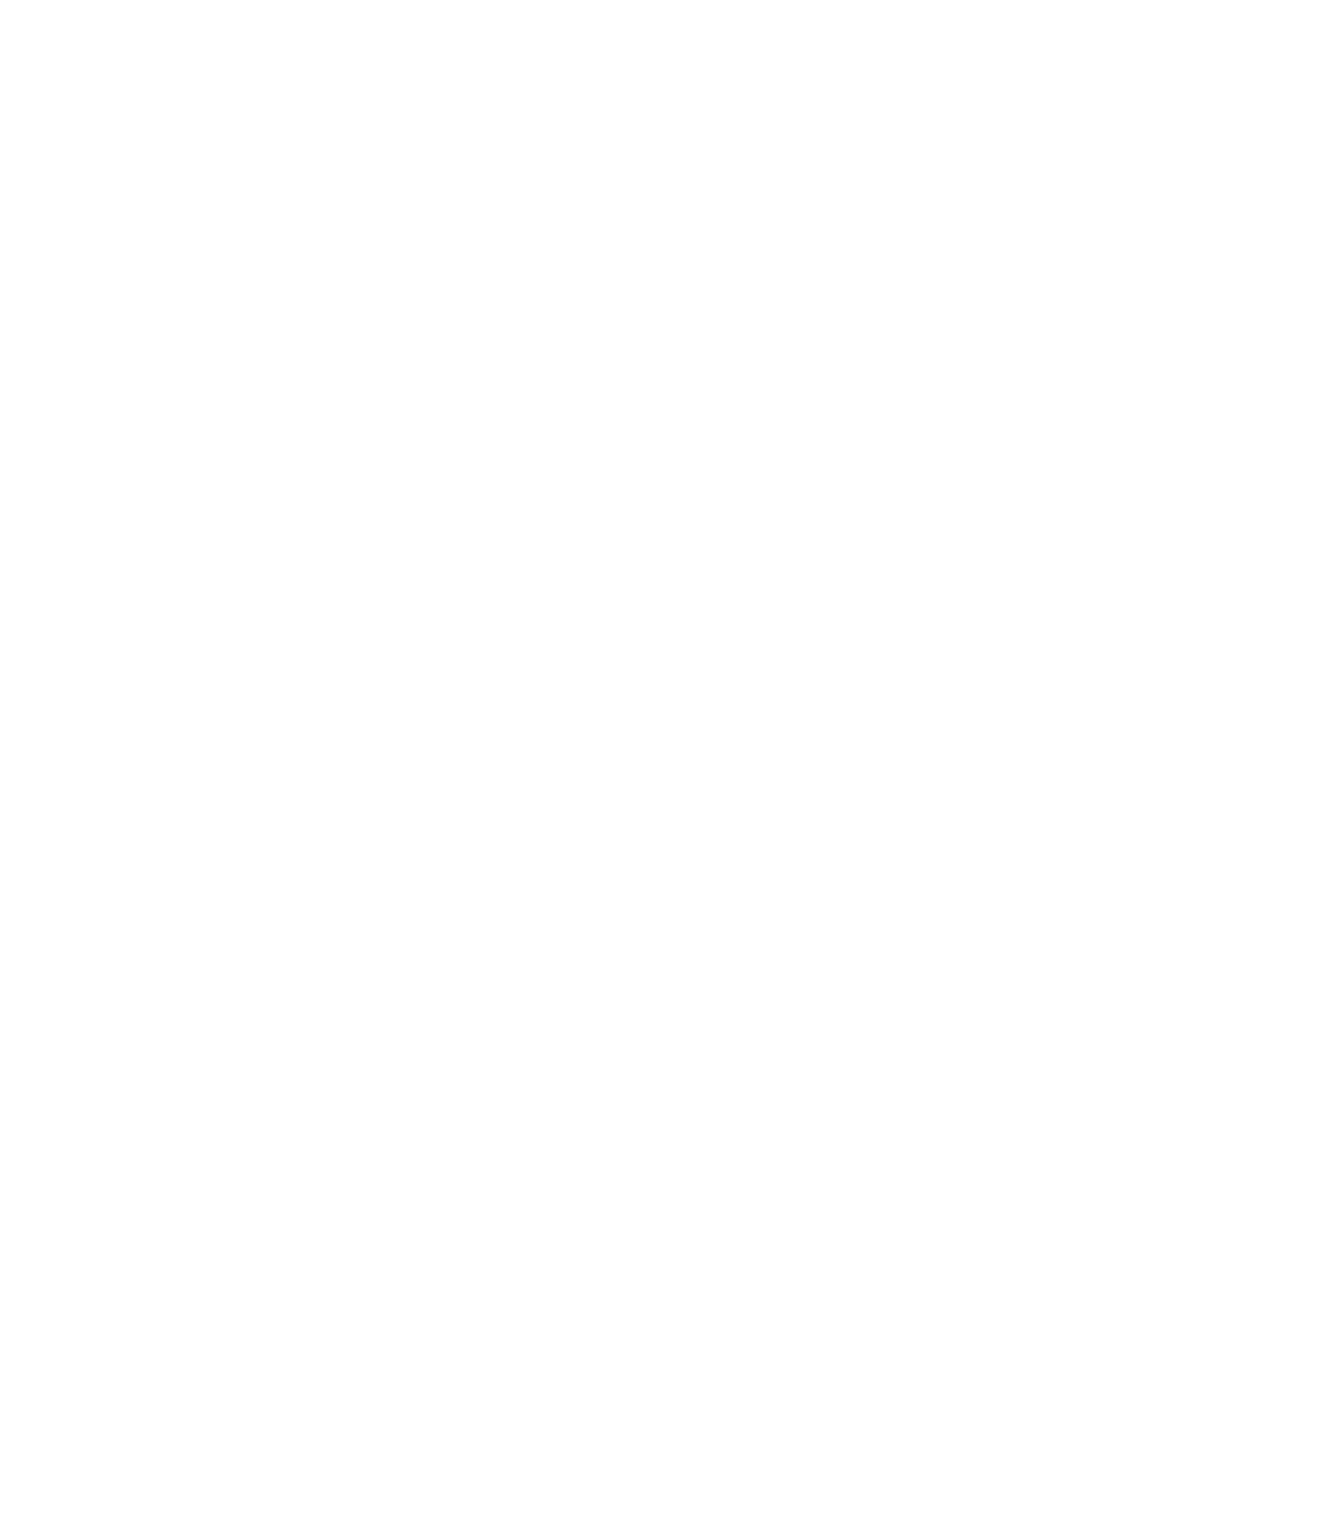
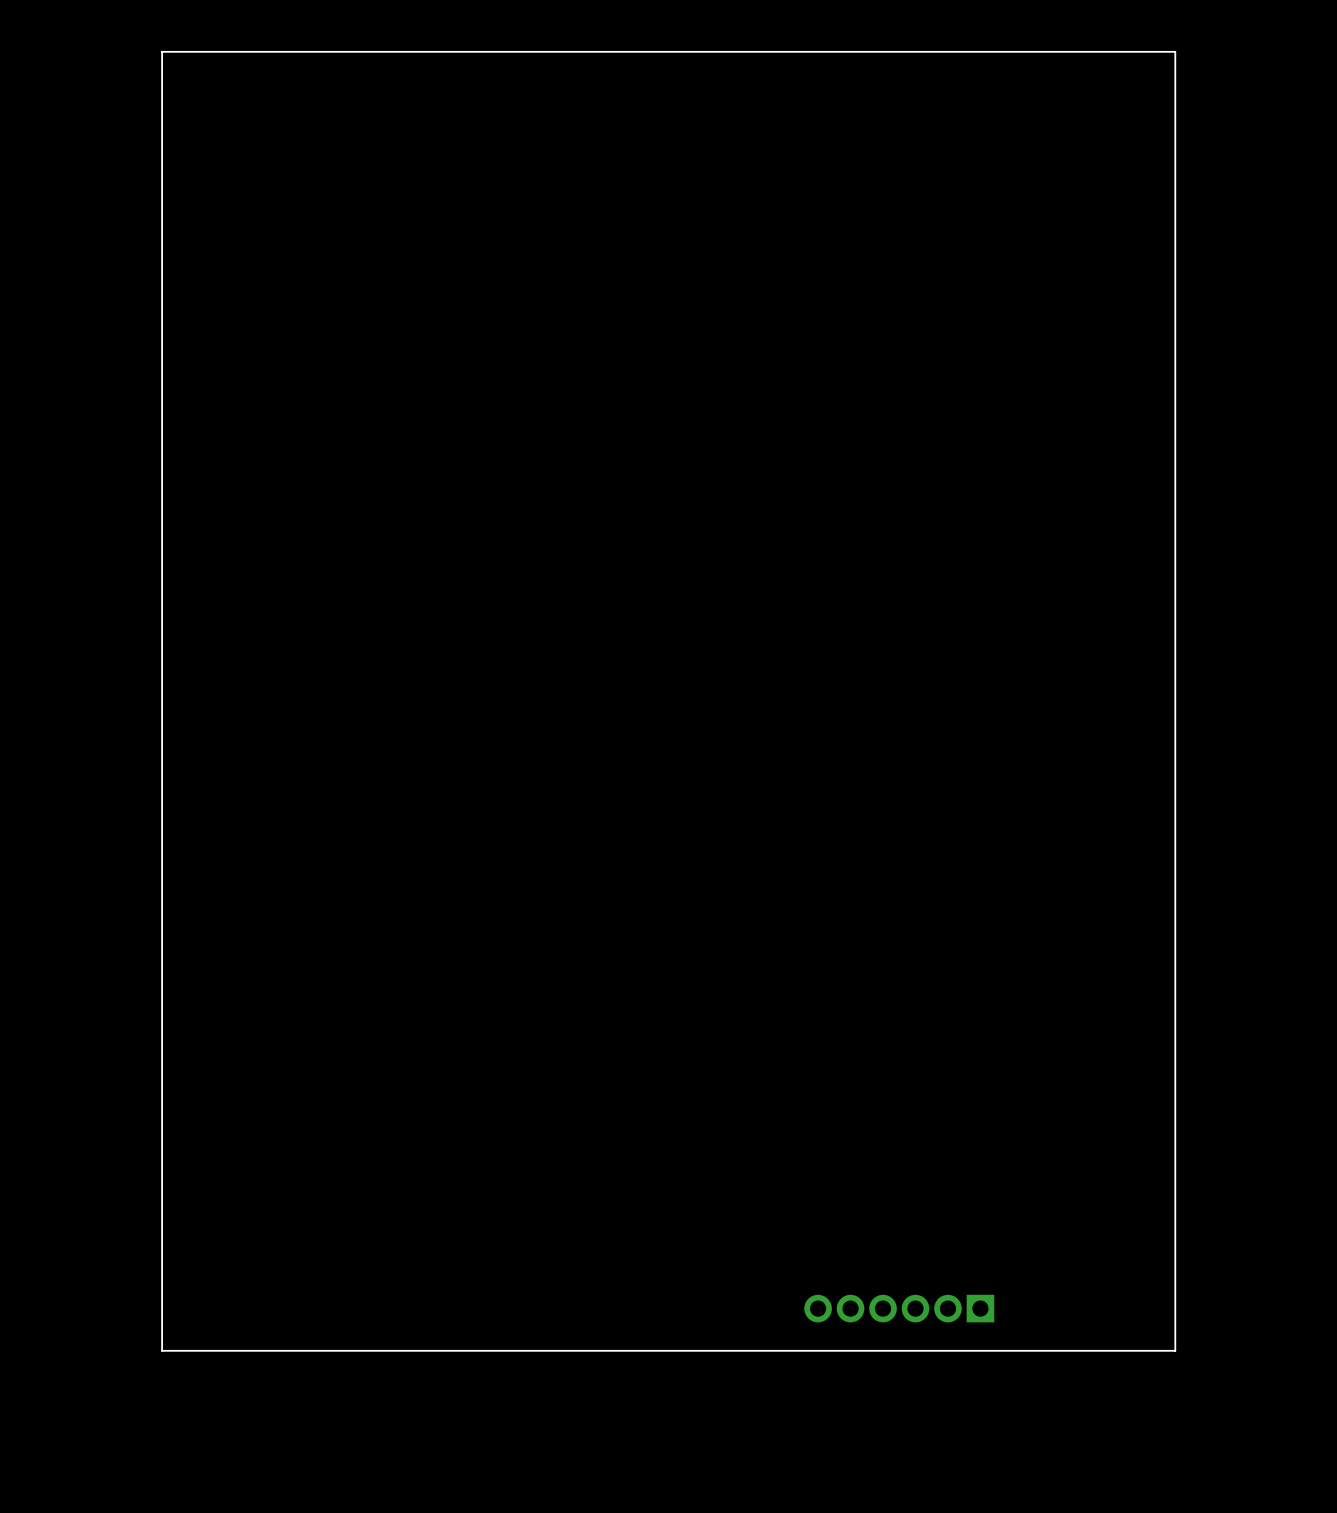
board edge: none -> (1175, 51) (162, 51) (162, 1350) (1175, 1350) (1175, 51)
part: none -> (899, 1308)

